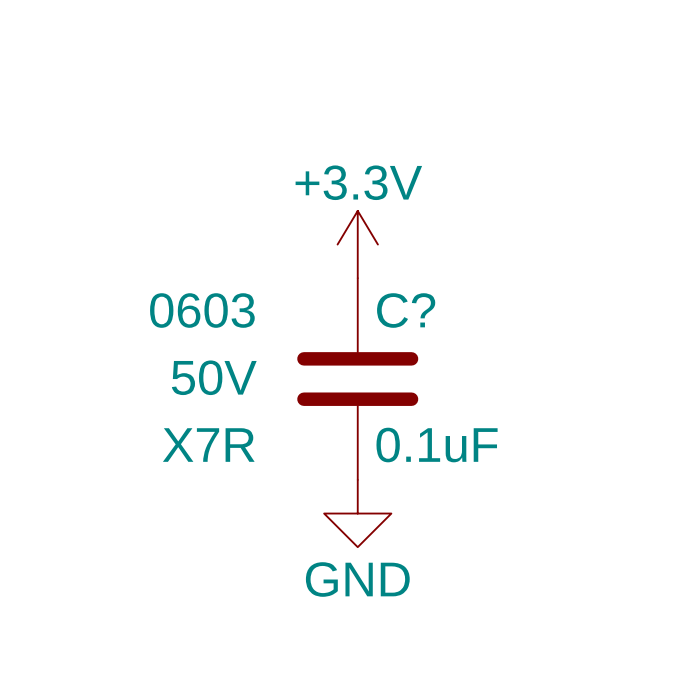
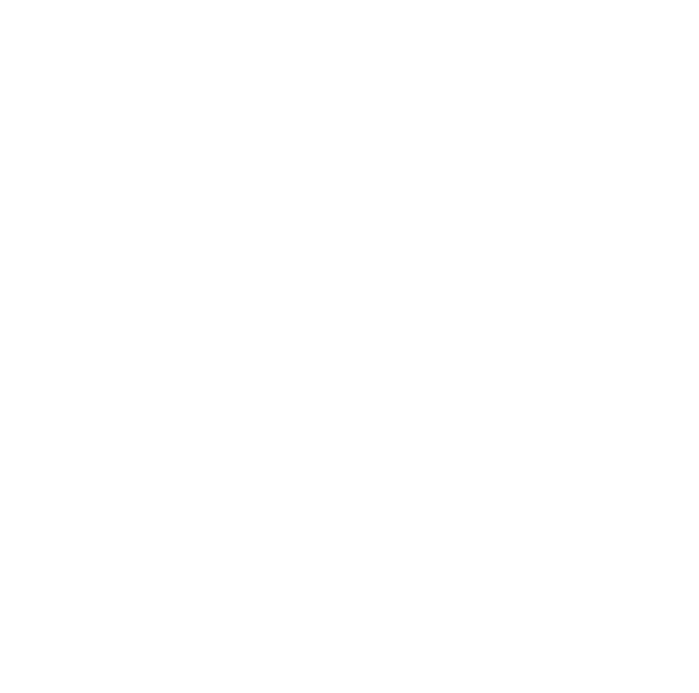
power symbol: +3.3V (357, 244) -> none
C?: 0.1uF (357, 379) -> none
power symbol: GND (357, 513) -> none

